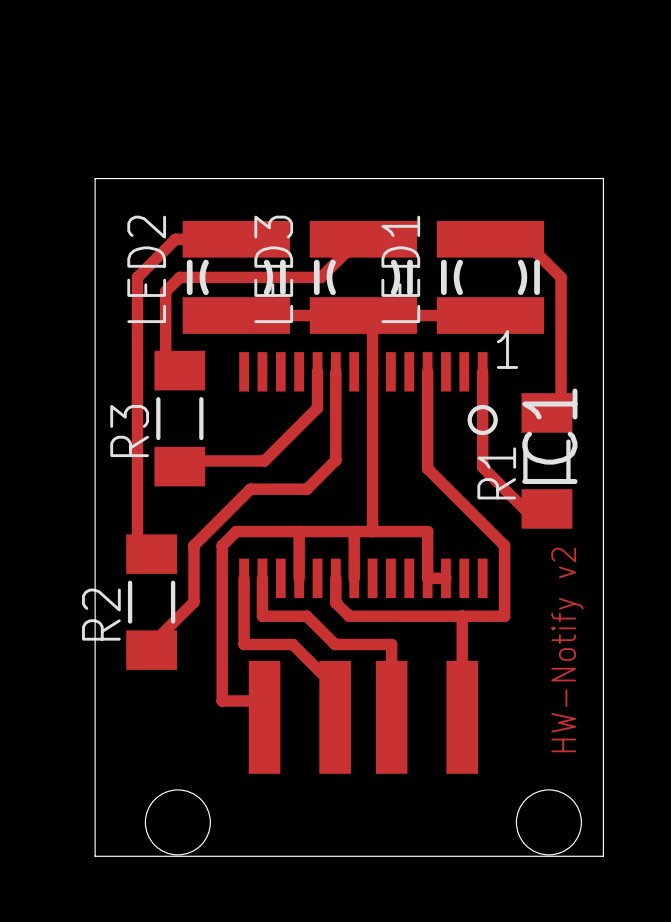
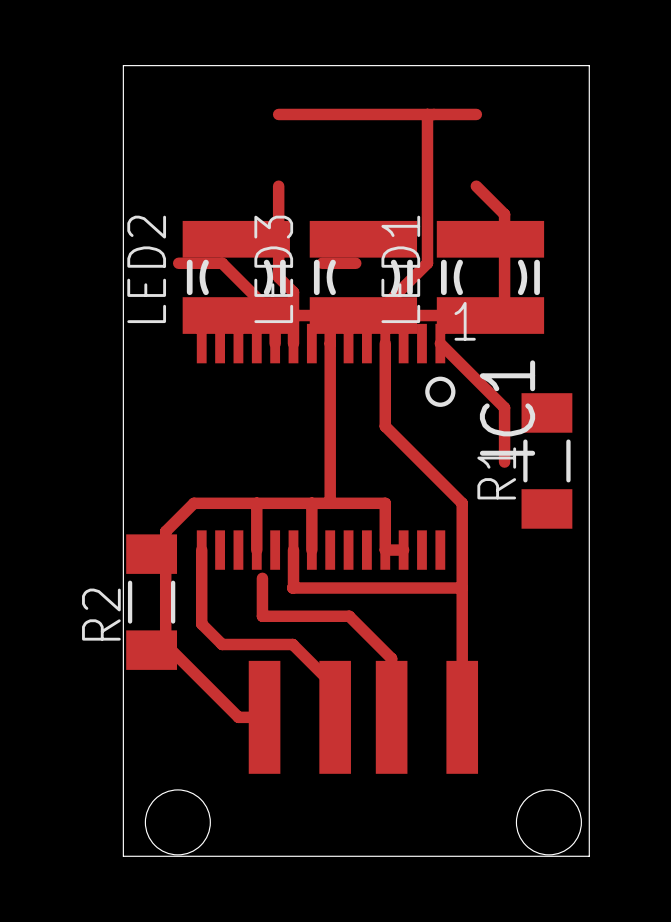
top track: none -> (278, 114) (476, 114)
top track: none -> (427, 114) (427, 263) (385, 305) (335, 305) (330, 310) (330, 503)
top track: none -> (278, 186) (278, 277) (293, 292) (293, 343)
top track: none -> (476, 186) (504, 214) (504, 318)
top track: (236, 239) (175, 239) (137, 277) (137, 540) (151, 554) -> none
top track: (363, 239) (359, 239) (321, 277) (179, 277) (165, 291) (165, 356) (179, 370) -> none
top track: (490, 239) (500, 249) (532, 249) (561, 277) (561, 398) (546, 412) -> none
top track: none -> (178, 263) (222, 263) (275, 316) (275, 343)
top track: none -> (322, 263) (355, 263)
top track: (372, 315) (372, 531) -> none
top track: none -> (440, 343) (504, 407) (504, 462)
top track: (317, 371) (317, 408) (264, 460) (185, 460) (179, 466) -> none
top track: (335, 371) (335, 460) (306, 489) (250, 489) (193, 545) (193, 602) (151, 644) (151, 650) -> none
top track: (427, 371) (427, 468) -> (385, 343) (385, 426) (427, 468)
top track: (482, 371) (482, 467) (524, 508) (546, 508) -> none
R3: (179, 418) -> none
IC1 position: (368, 475) -> (326, 446)
top track: (462, 503) (504, 545) (504, 616) (349, 616) (335, 602) (335, 578) -> (462, 503) (462, 616)
top track: (299, 531) (299, 578) -> (256, 503) (256, 550)
top track: (354, 531) (354, 578) -> (311, 503) (311, 550)
top track: none -> (293, 550) (292, 588) (462, 588)
top track: none -> (403, 550) (385, 550) (385, 503) (193, 503) (165, 531) (165, 644) (238, 717) (264, 717)
top track: (244, 578) (244, 644) -> (201, 550) (201, 624) (222, 644) (244, 644)
top track: (445, 578) (427, 578) (427, 531) (236, 531) (222, 545) (222, 700) (264, 700) (264, 715) -> none
top track: (306, 616) (335, 644) (391, 644) (391, 658) -> (306, 616) (349, 616) (391, 658)
text: HW-Notify v2 (567, 650) -> none
board edge: (123, 856) (95, 856) (95, 178) (603, 178) (603, 856) (589, 856) -> (123, 856) (123, 65) (589, 65) (589, 856)

